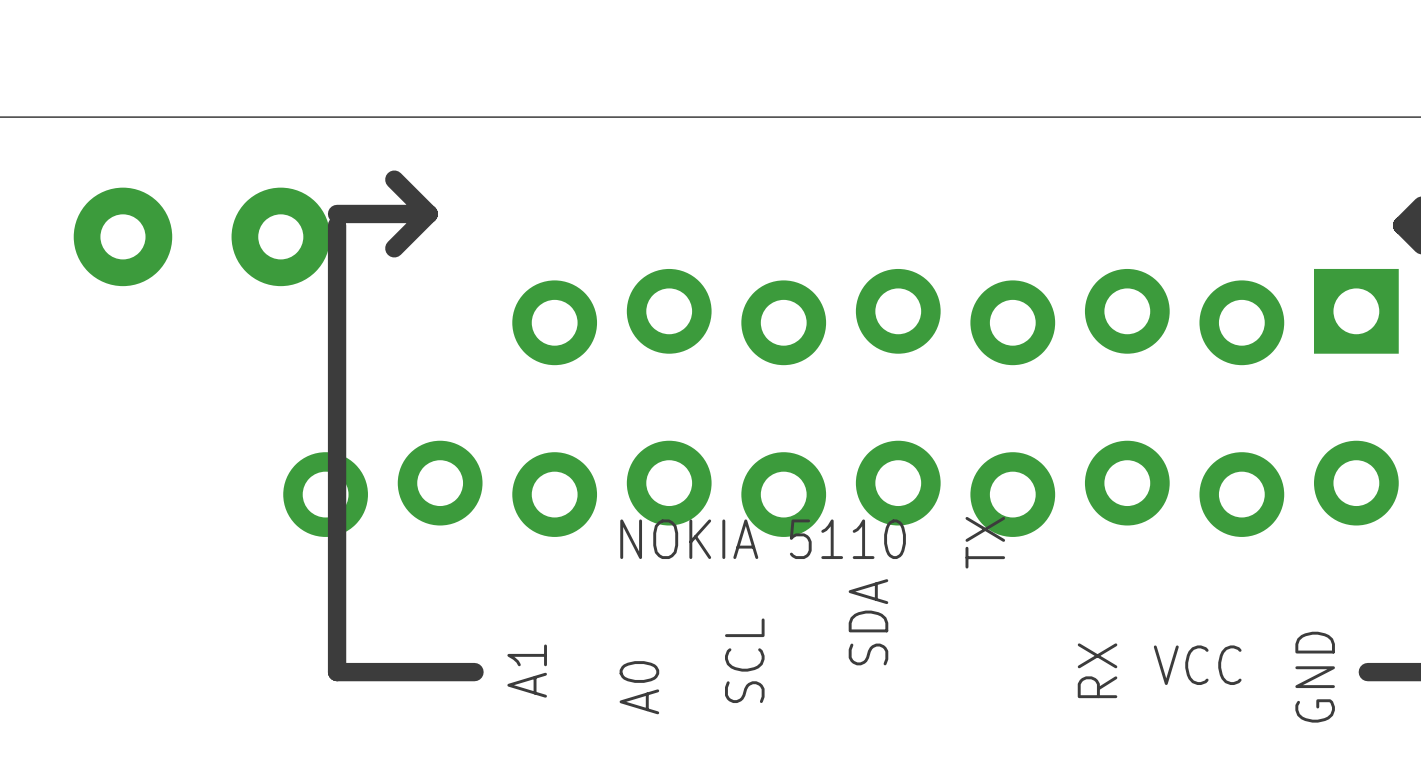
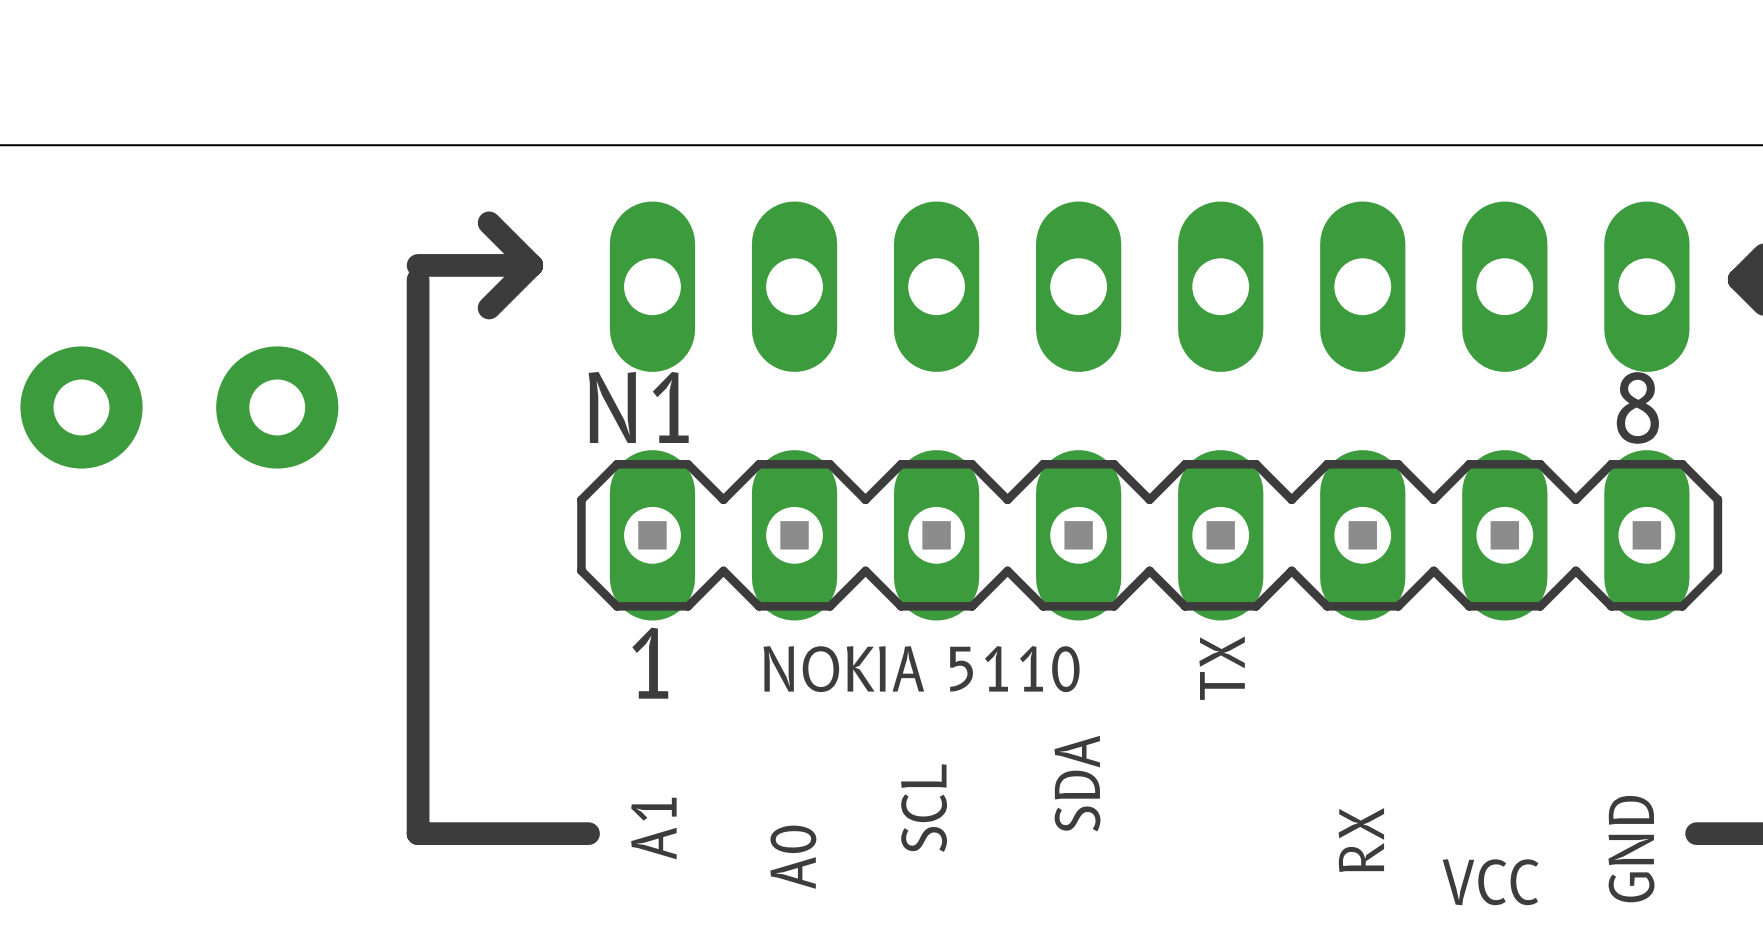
part: none -> (1149, 286)
part position: (201, 236) -> (179, 407)
part: (955, 317) -> none
N1: none -> (1149, 535)
part: (840, 488) -> none
text position: VCC (1197, 665) -> VCC (1490, 882)

